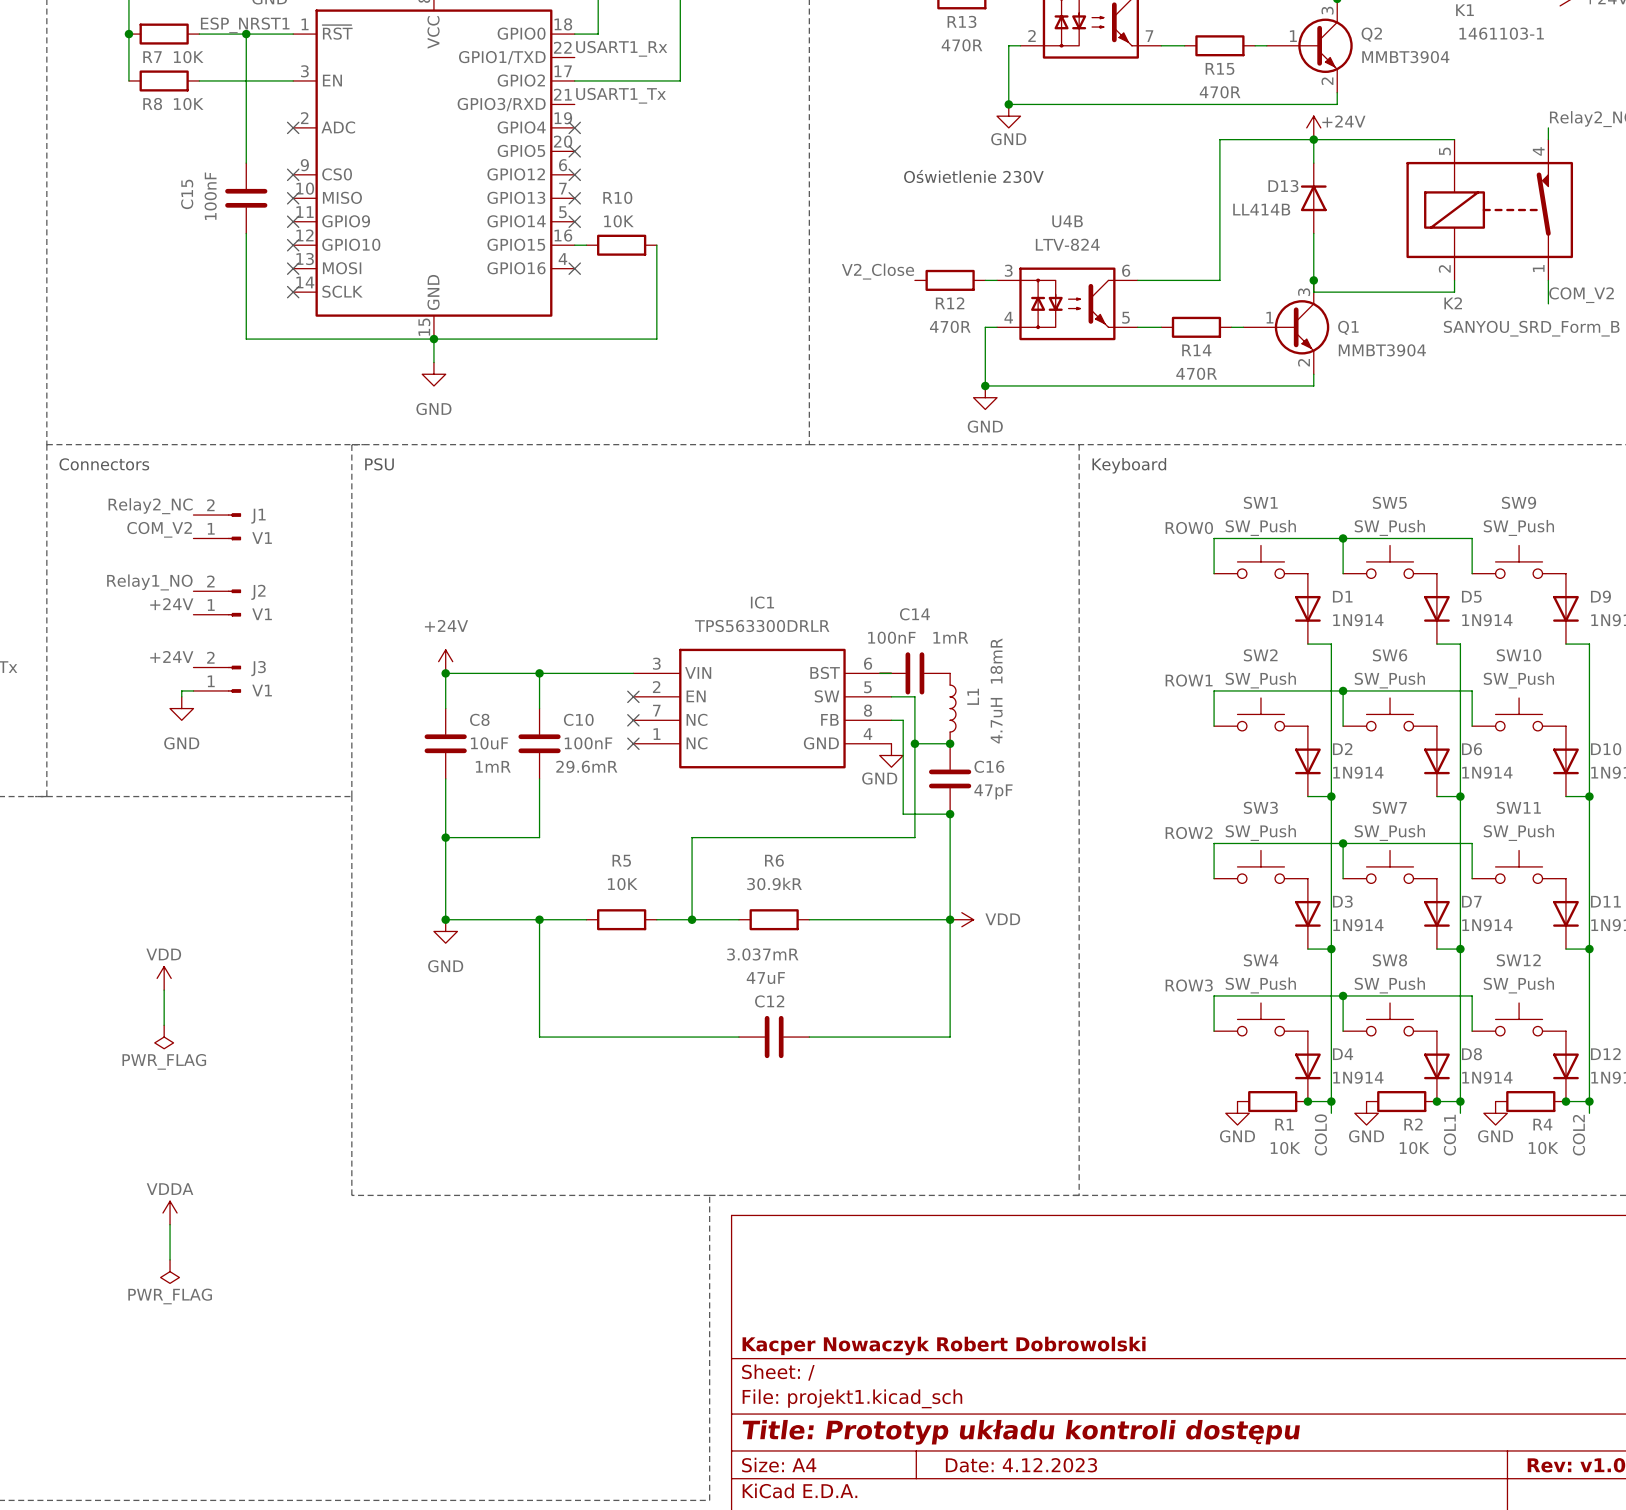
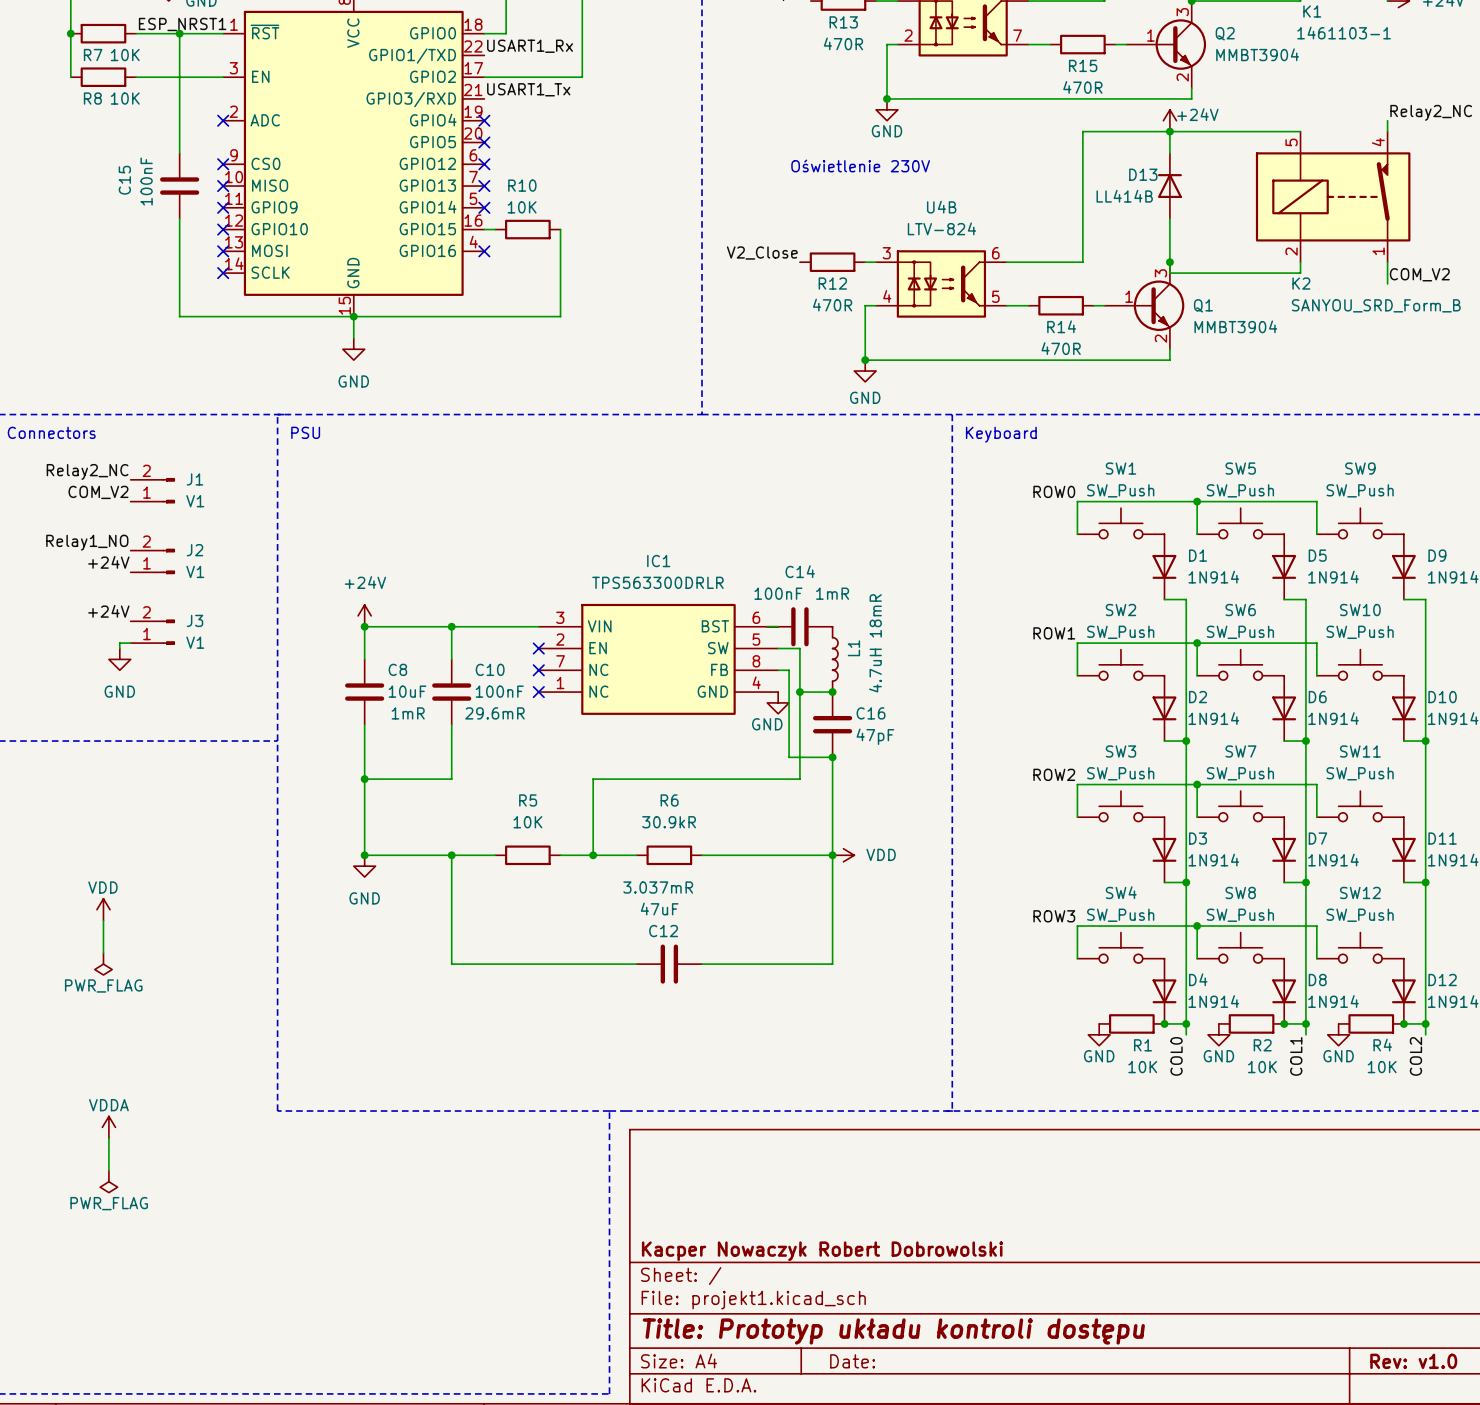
title block: Date: 4.12.2023 (1021, 1465) -> Date: (852, 1361)

